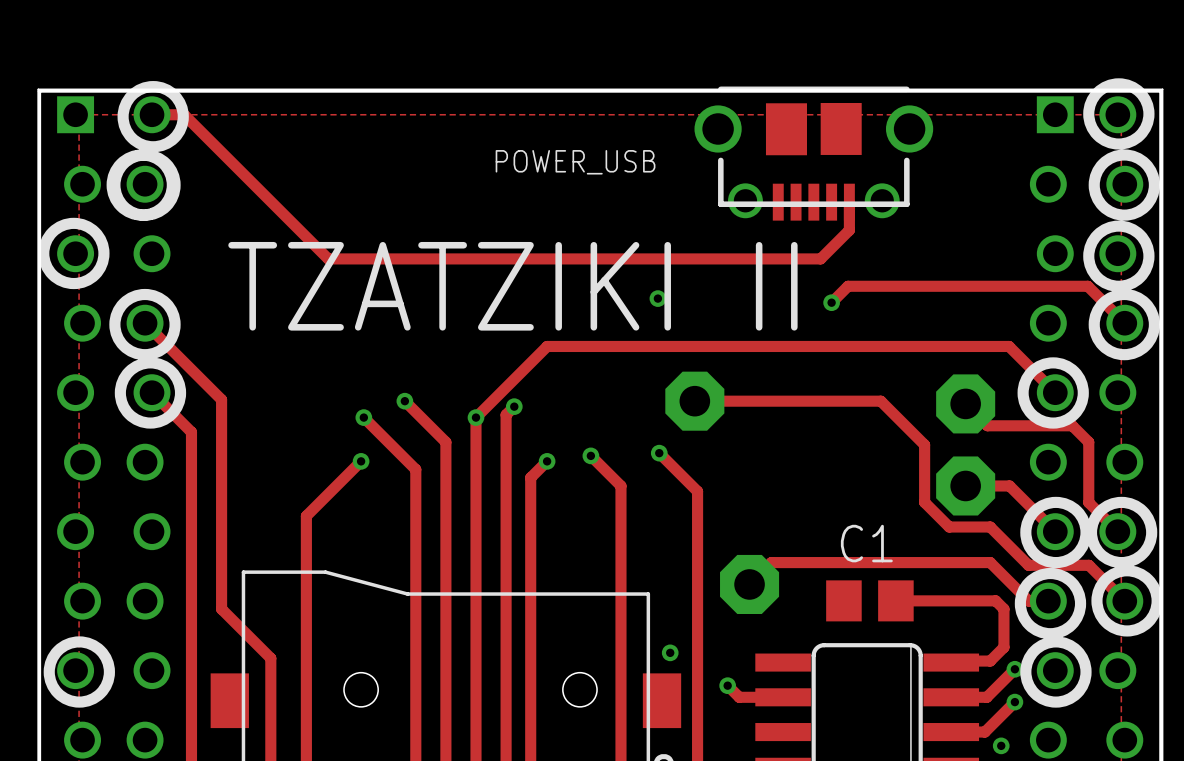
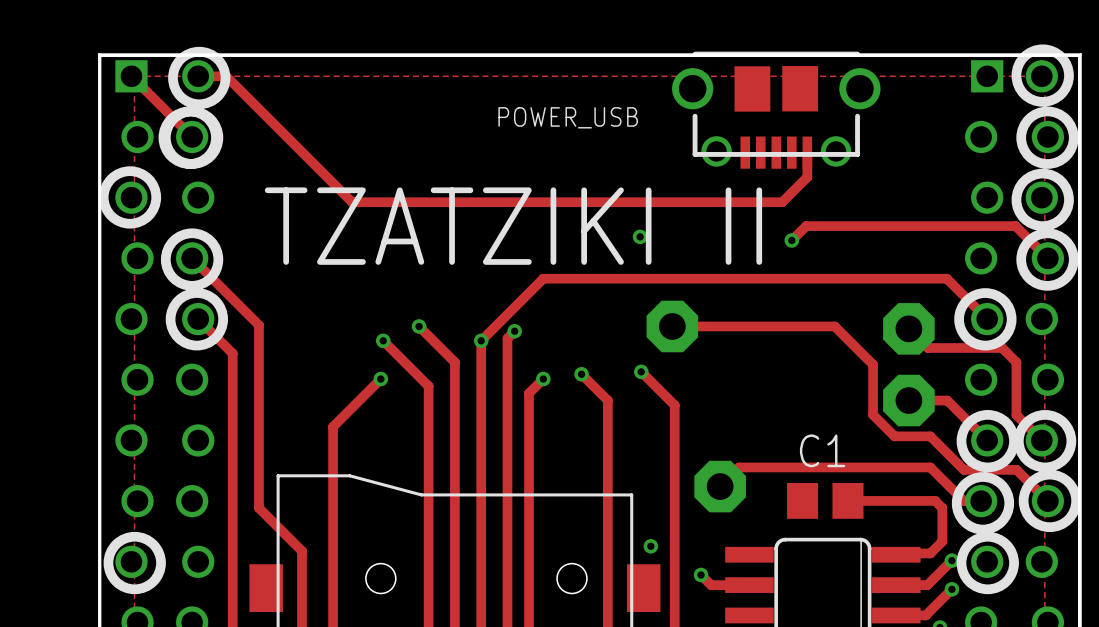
track: none -> (131, 76) (192, 136)

